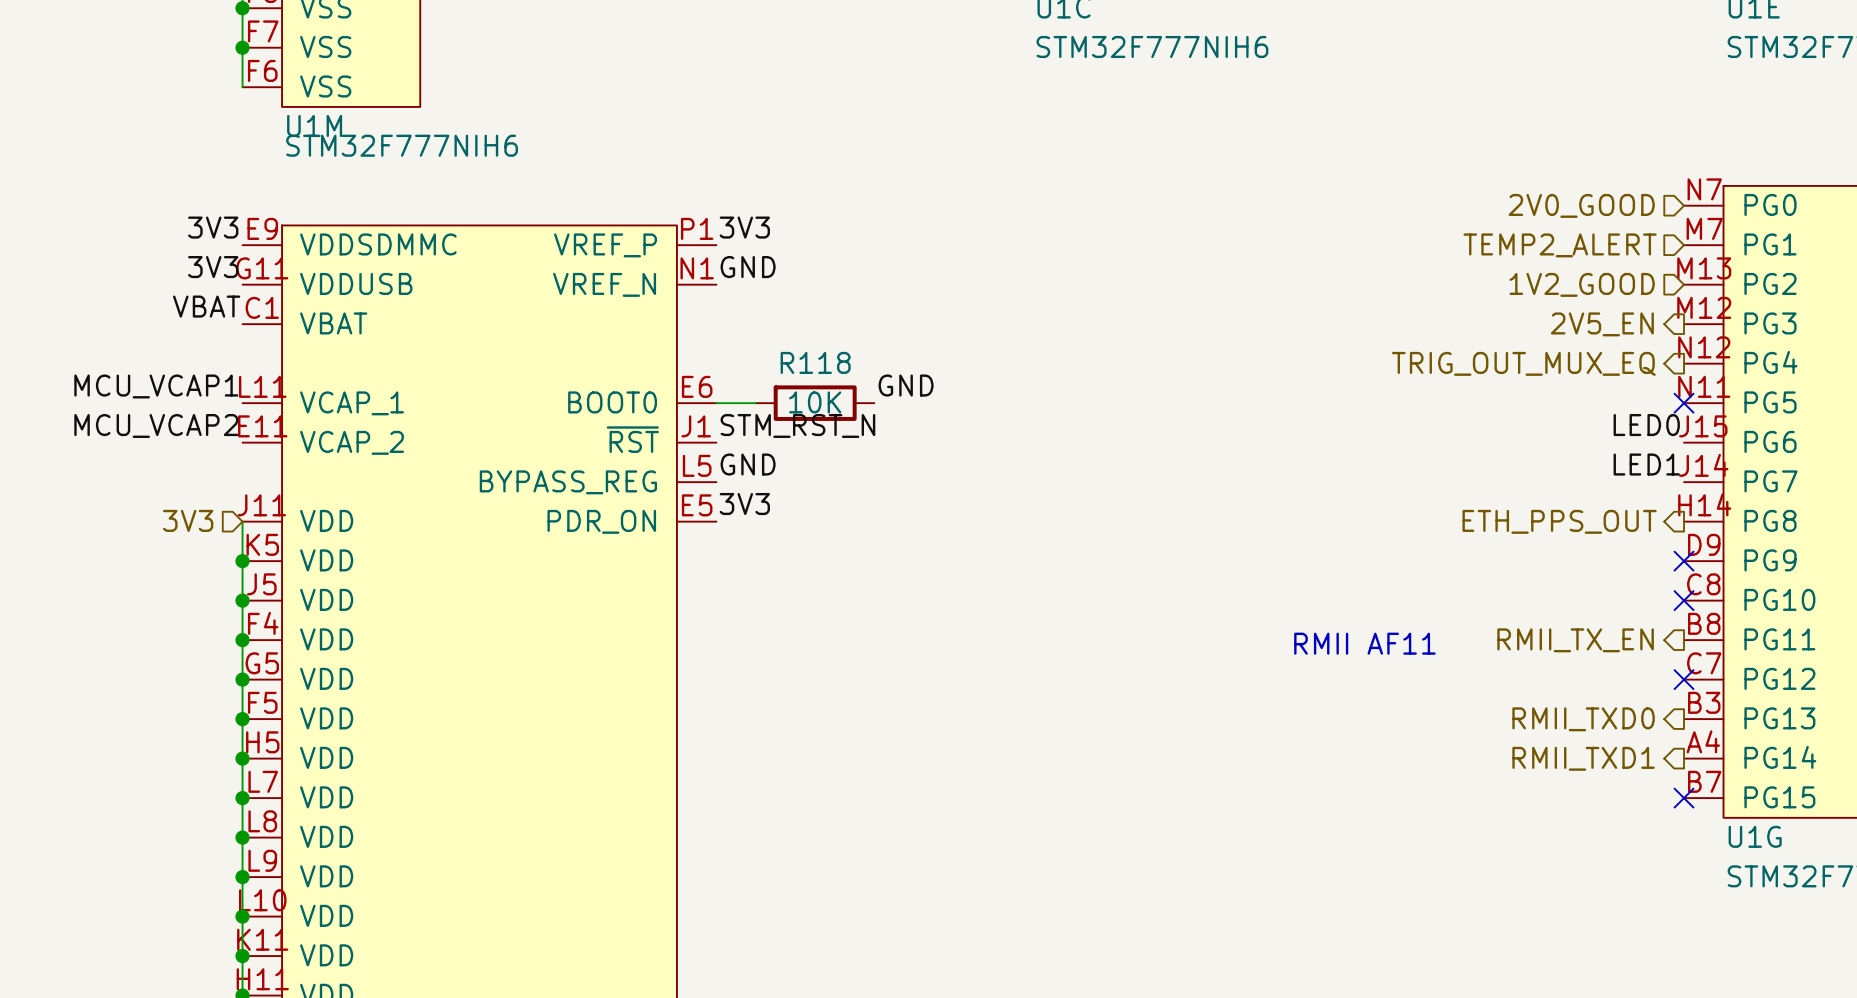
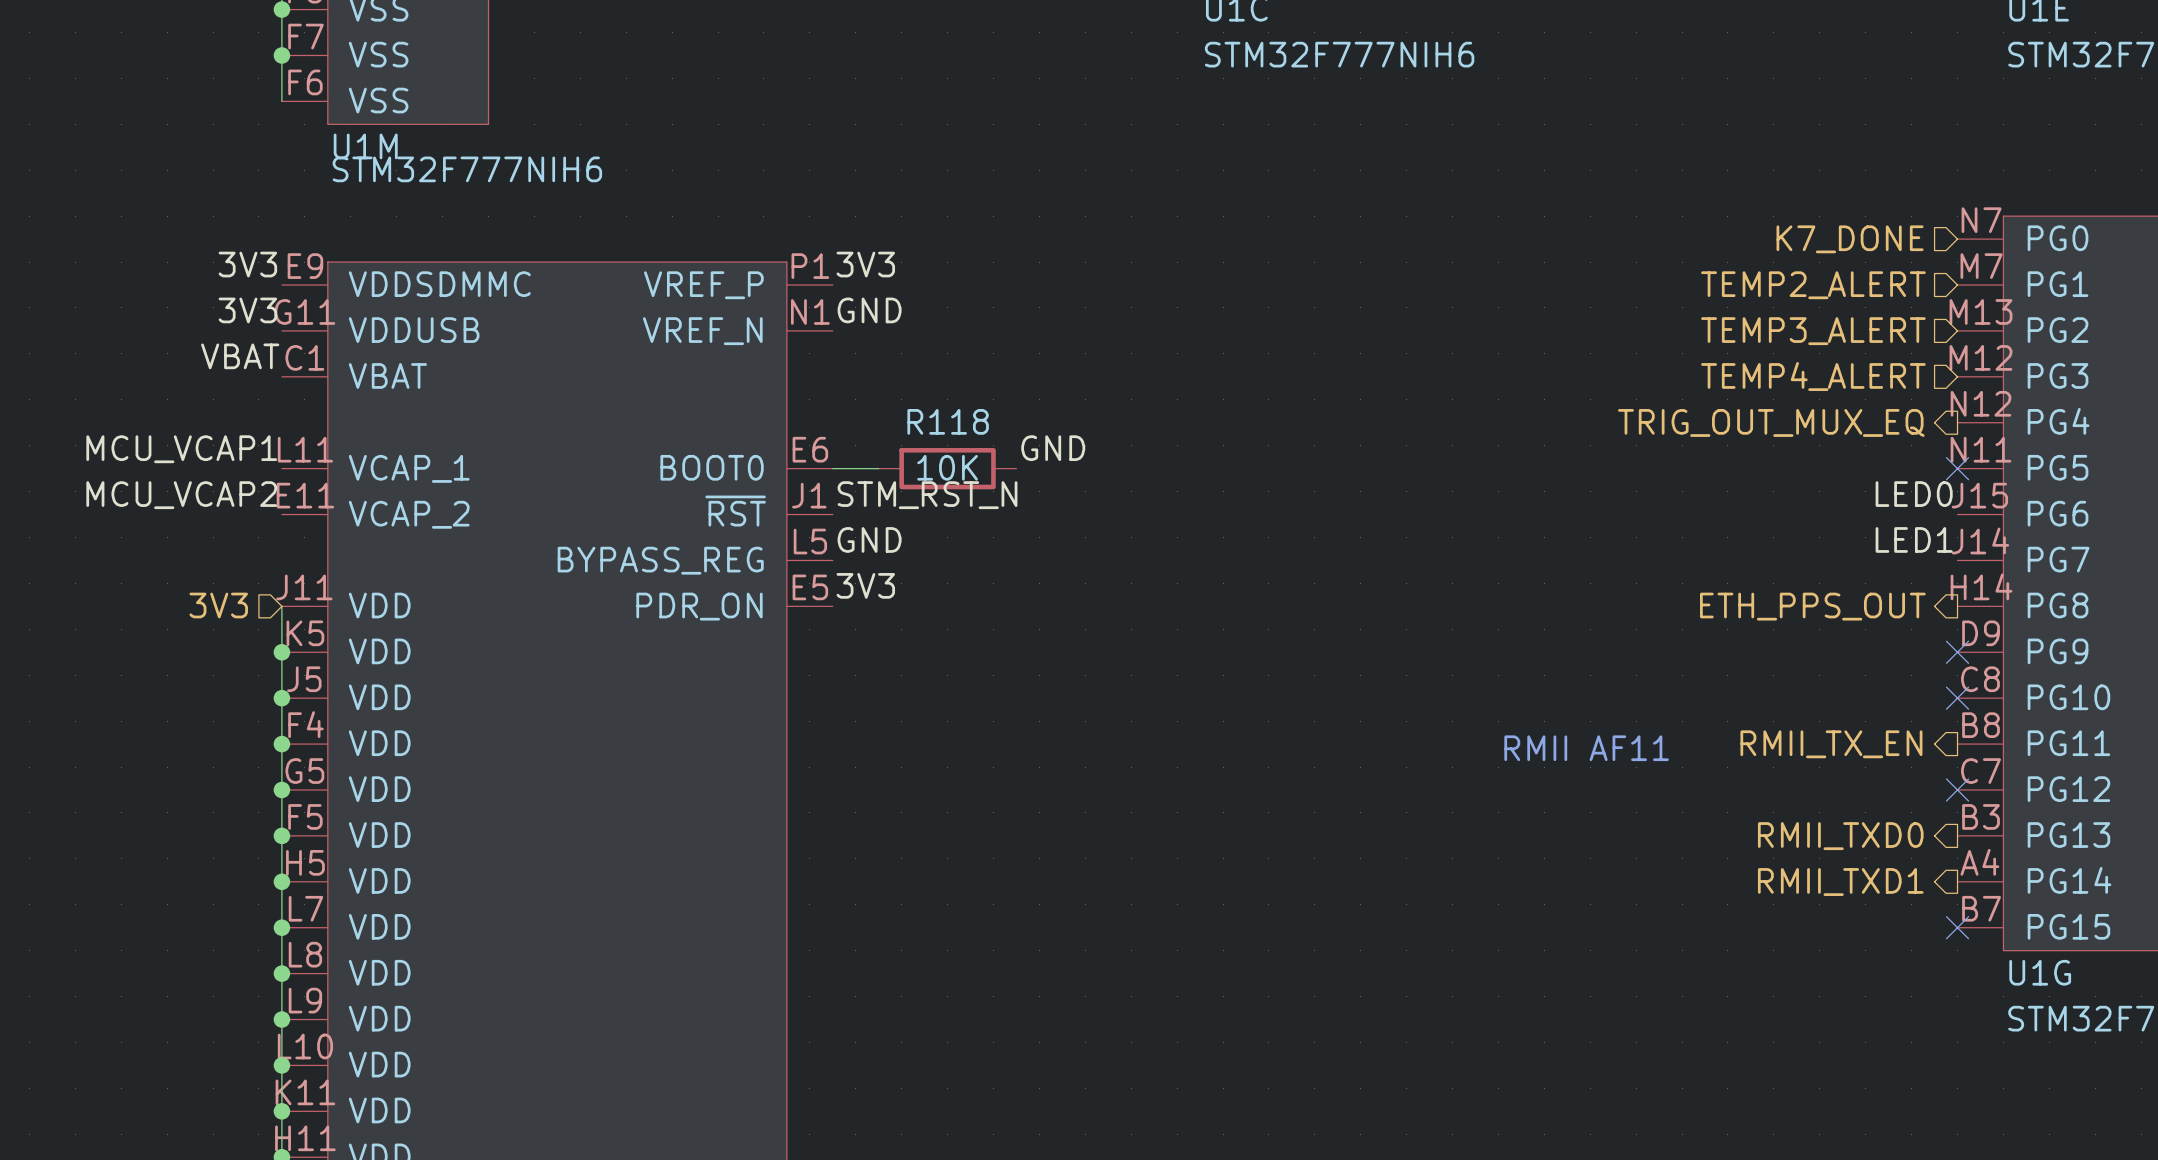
hierarchical label: 2V0_GOOD (1581, 205) -> K7_DONE (1850, 239)
hierarchical label: 1V2_GOOD (1582, 284) -> TEMP3_ALERT (1813, 331)
hierarchical label shape: output (1602, 324) -> input (1813, 376)
hierarchical label: 2V5_EN (1602, 324) -> TEMP4_ALERT (1813, 376)

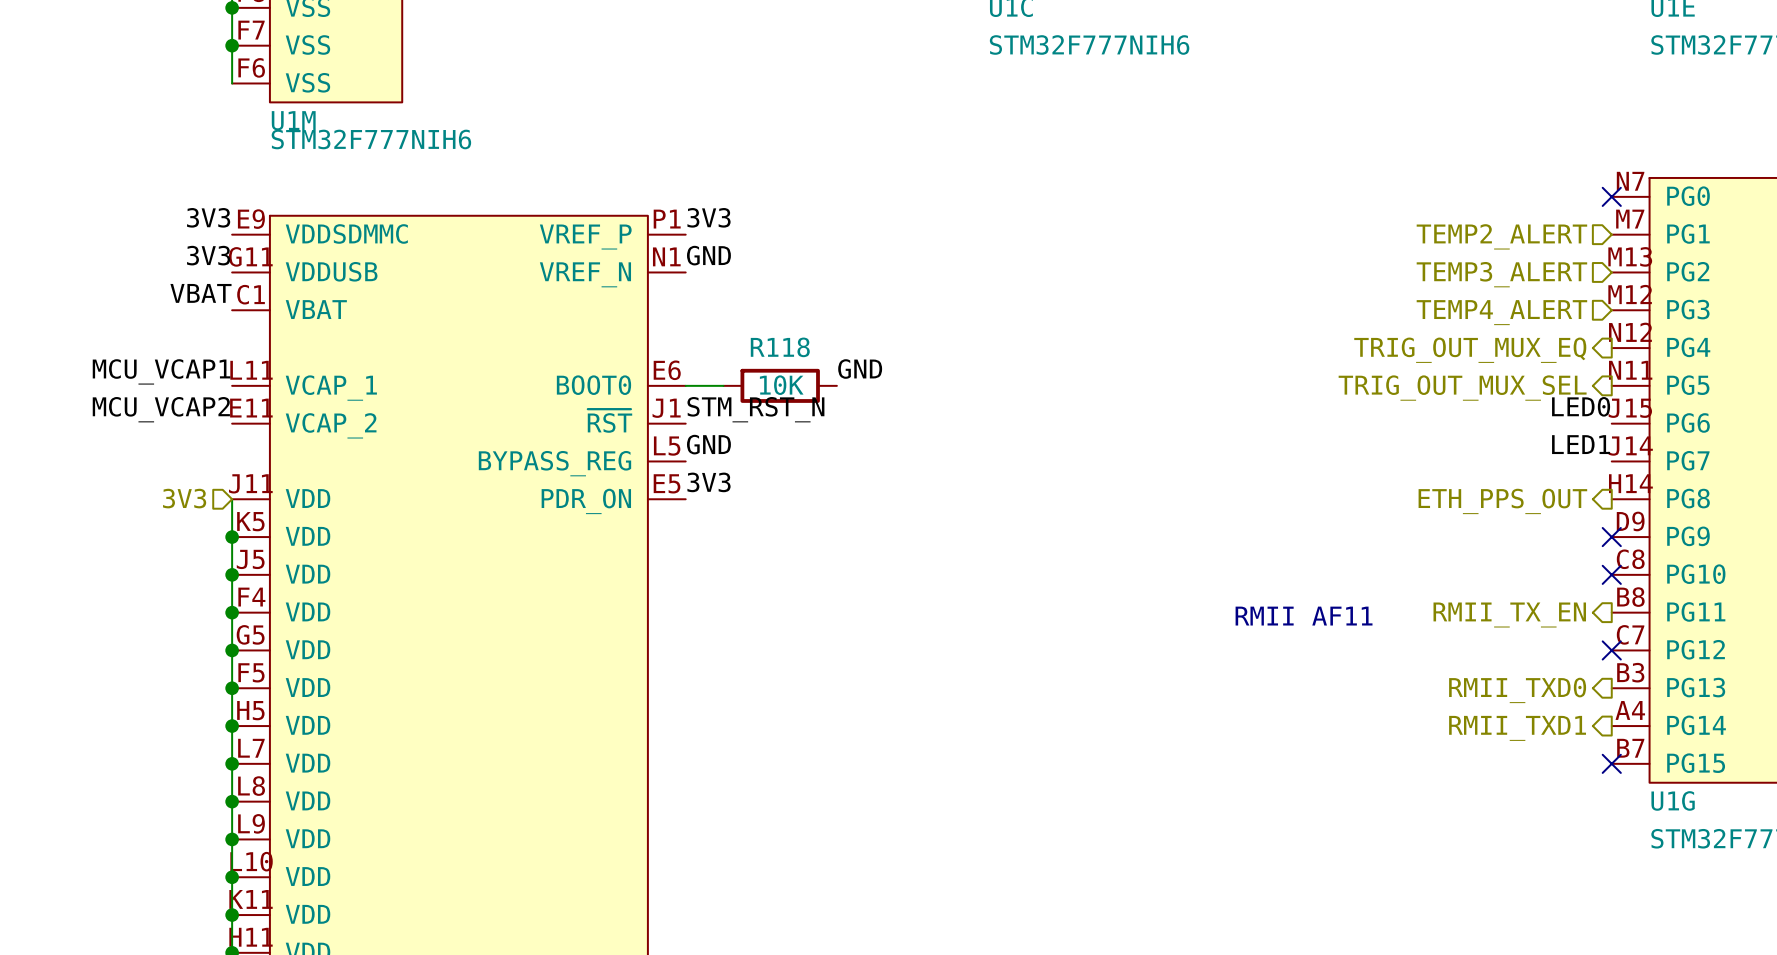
hierarchical label: K7_DONE (1850, 239) -> none
no-connect mark: none -> (1611, 196)
hierarchical label: none -> TRIG_OUT_MUX_SEL (1462, 388)
no-connect mark: (1957, 468) -> none

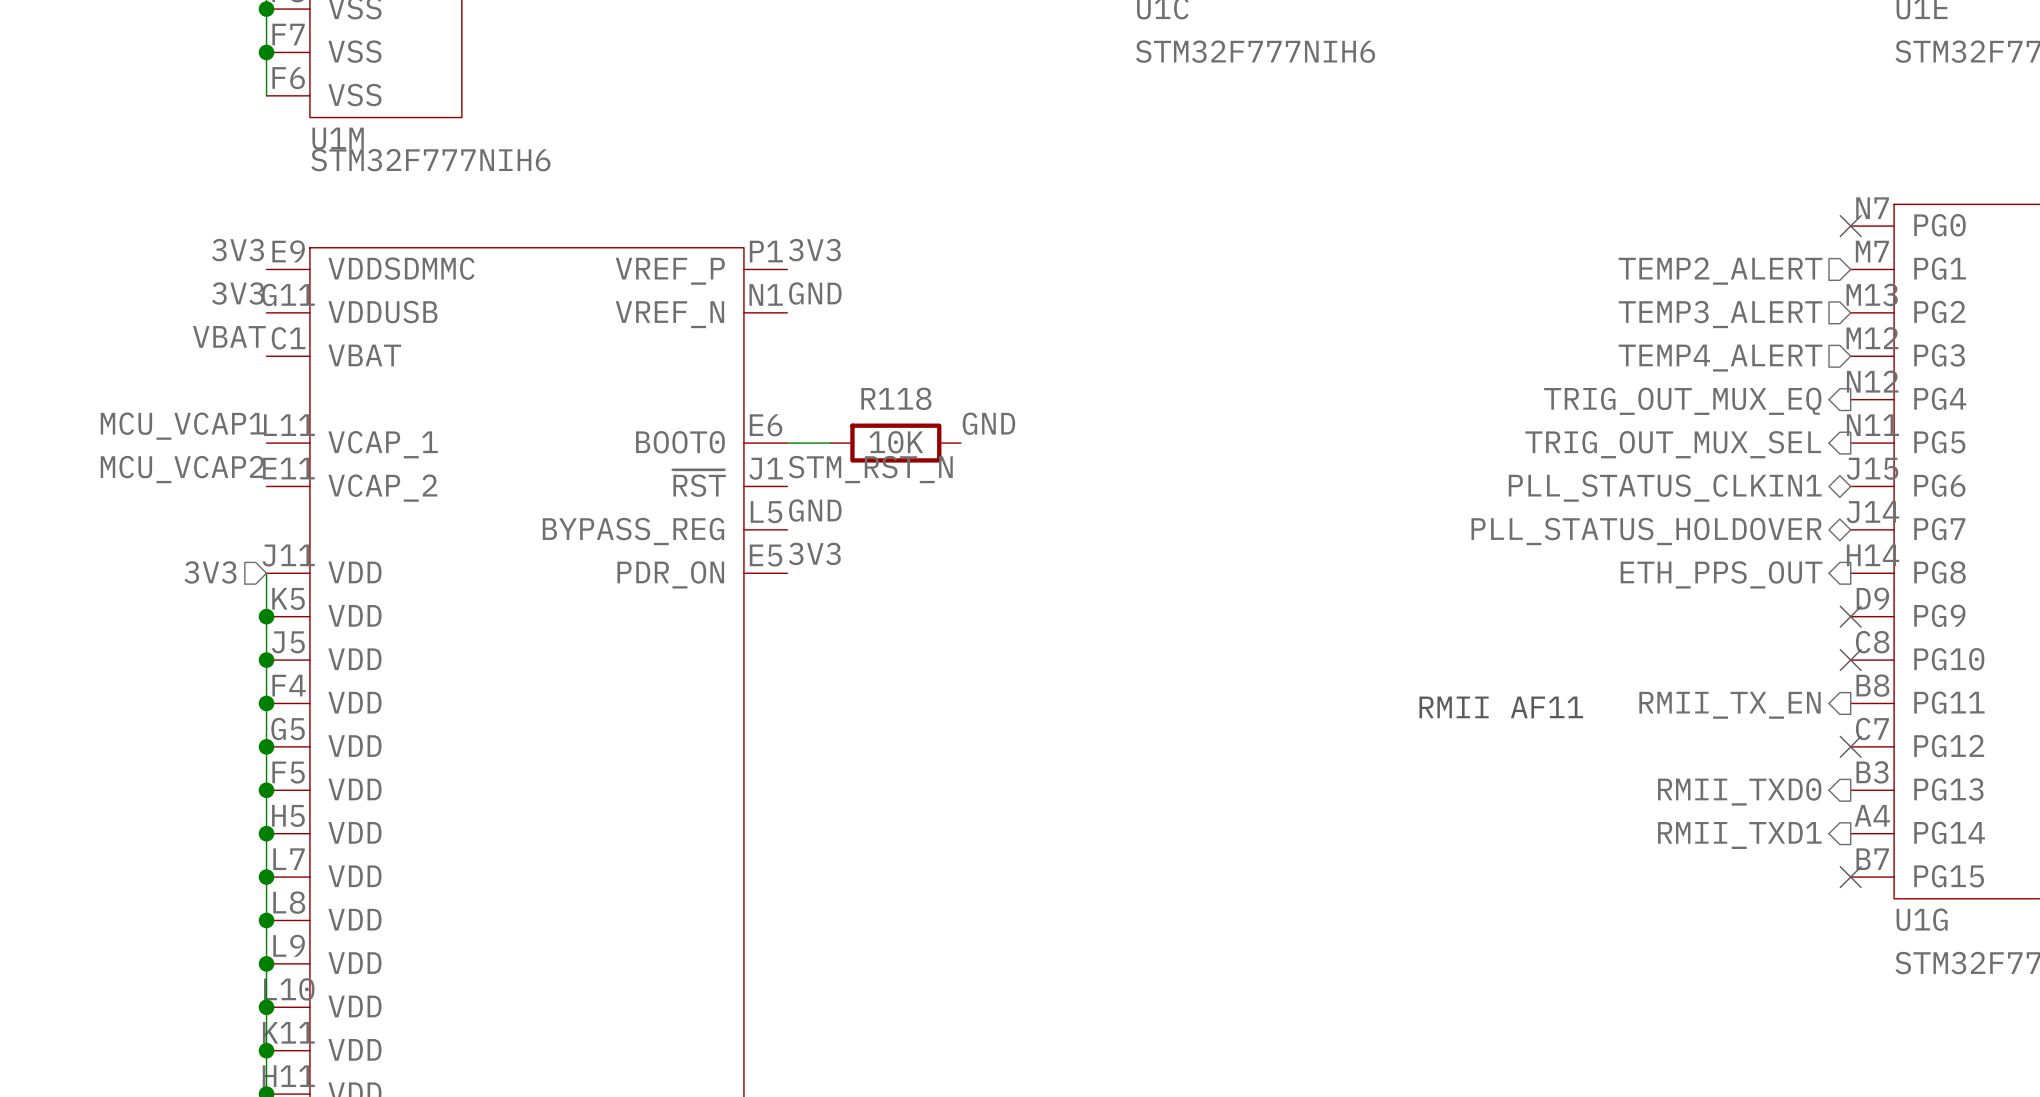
label: LED0 (1581, 406) -> none
hierarchical label: none -> PLL_STATUS_CLKIN1 (1665, 488)
label: LED1 (1581, 444) -> none
hierarchical label: none -> PLL_STATUS_HOLDOVER (1646, 531)

